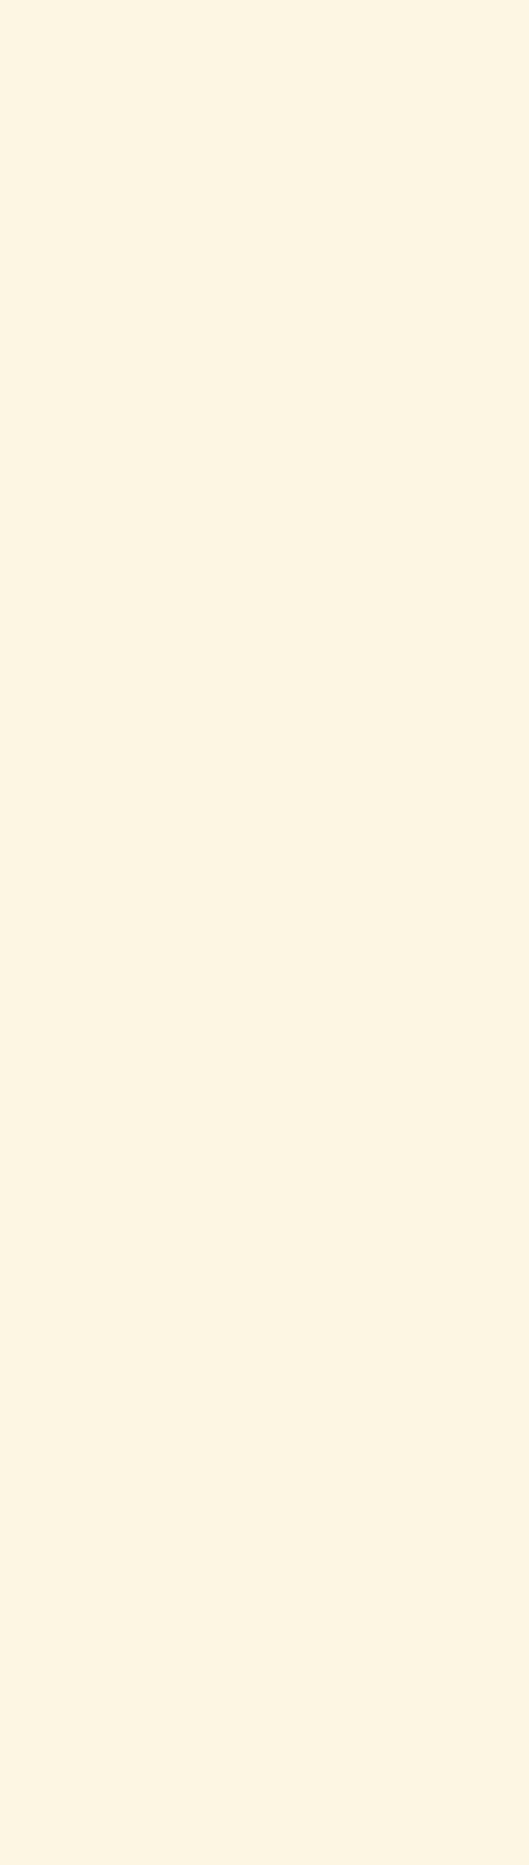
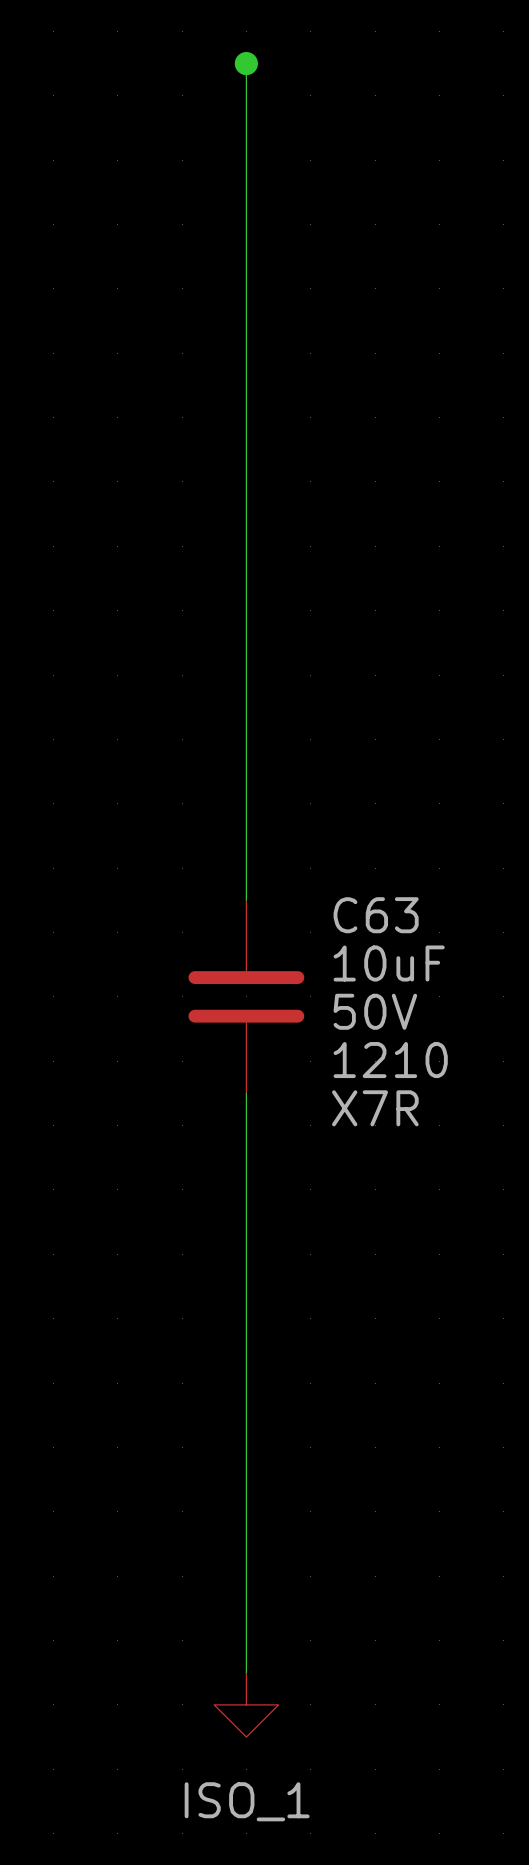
wire: none -> (246, 63) (246, 900)
junction: none -> (246, 63)
C63: none -> 10uF (246, 996)
wire: none -> (246, 1093) (246, 1672)
power symbol: none -> ISO_1 (246, 1704)

